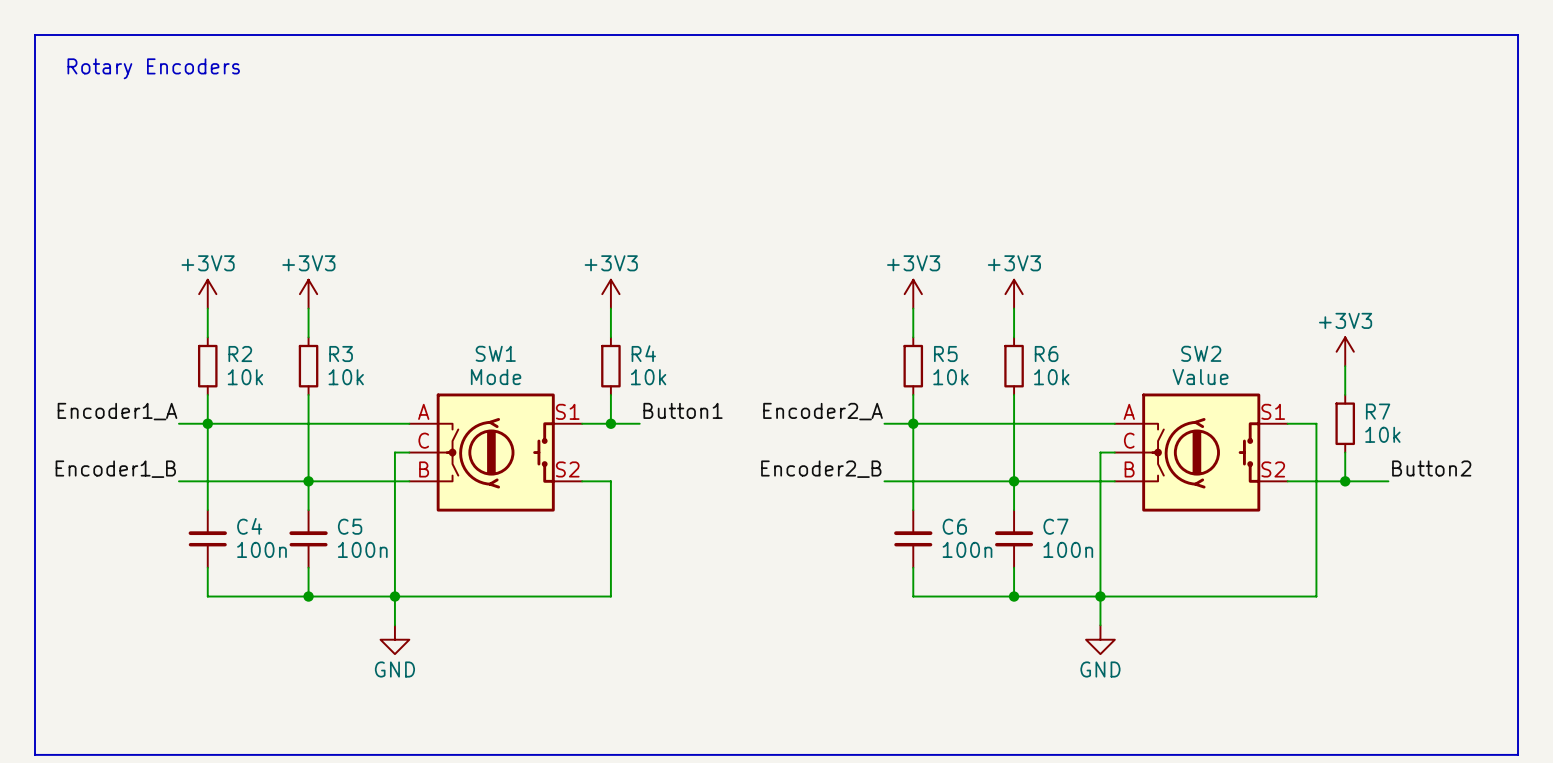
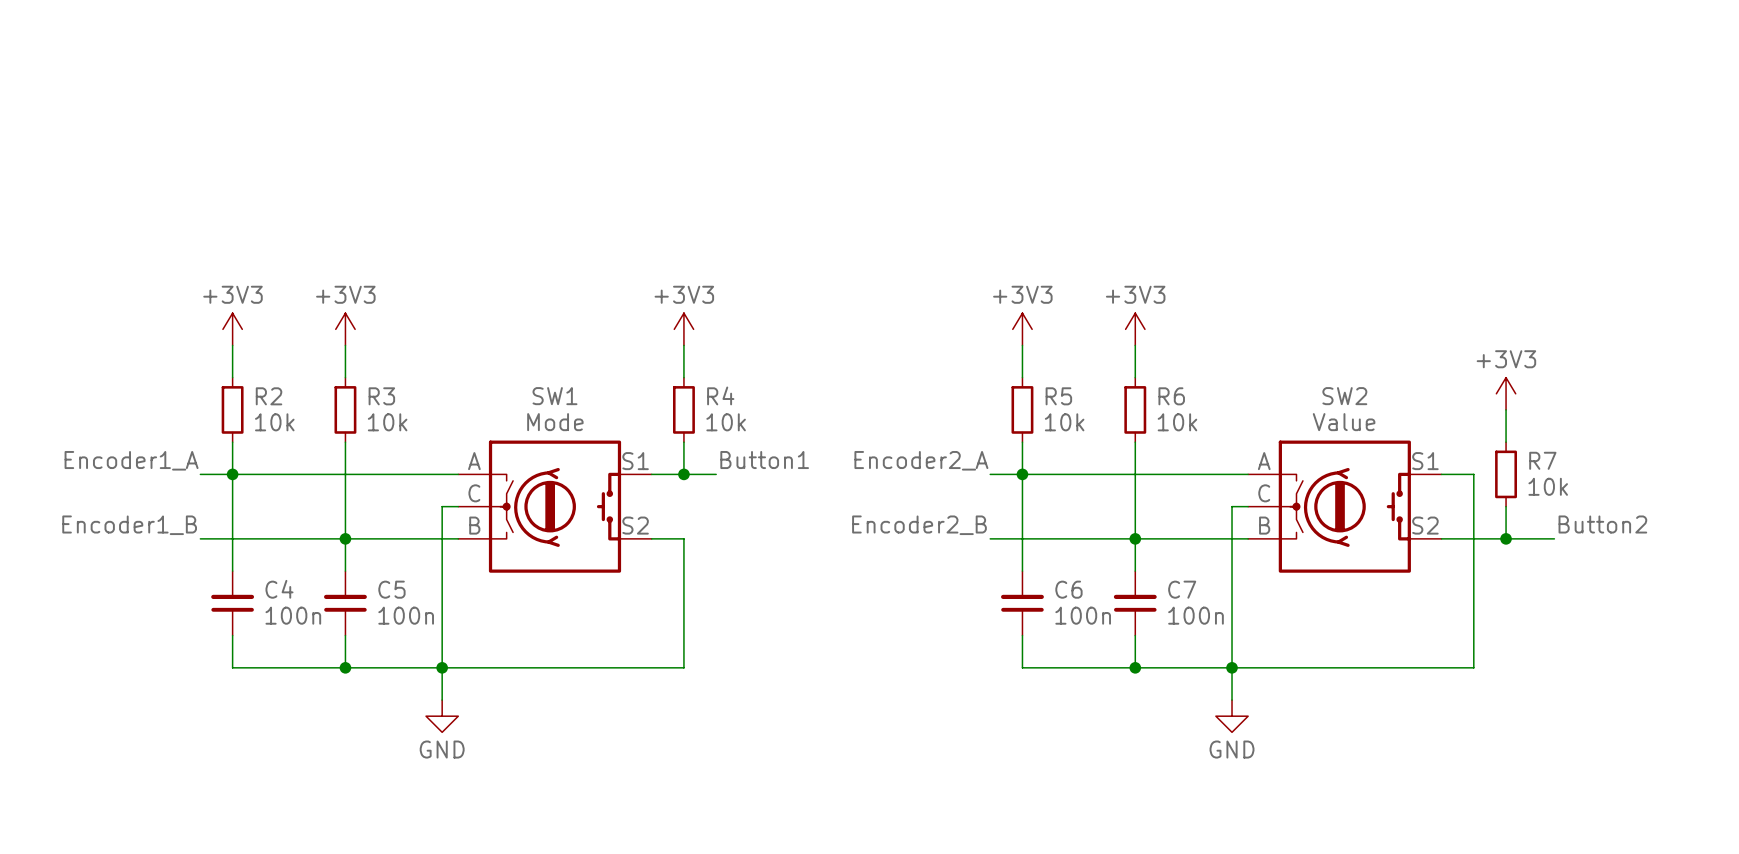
line: (34, 34) (1518, 34) (1518, 754) (34, 754) (34, 34) -> none
text: Rotary Encoders (153, 68) -> none

